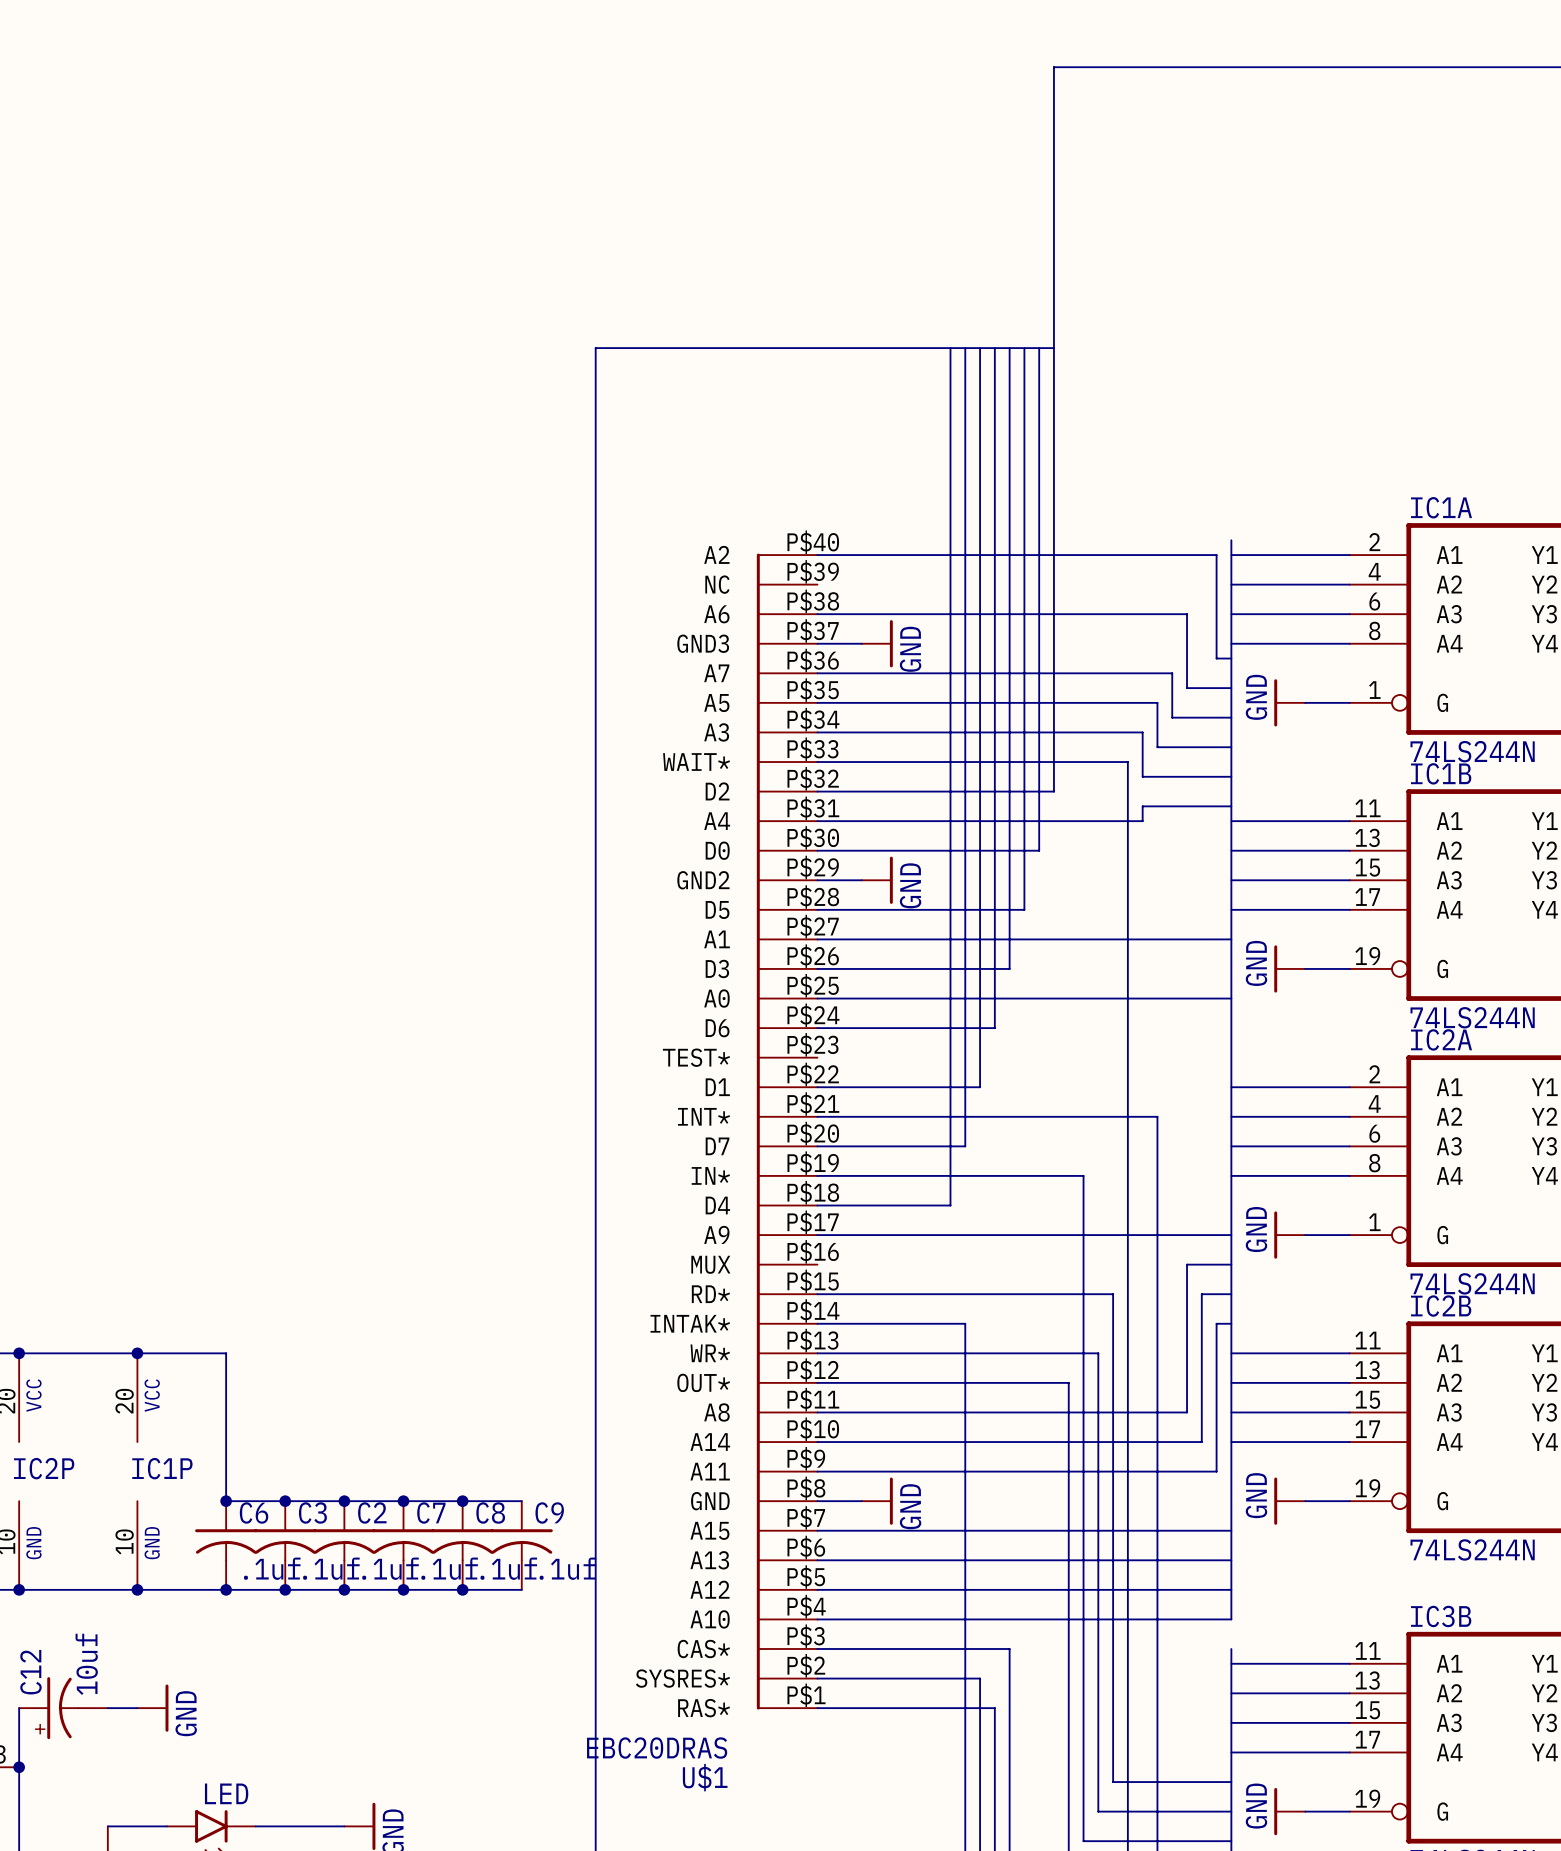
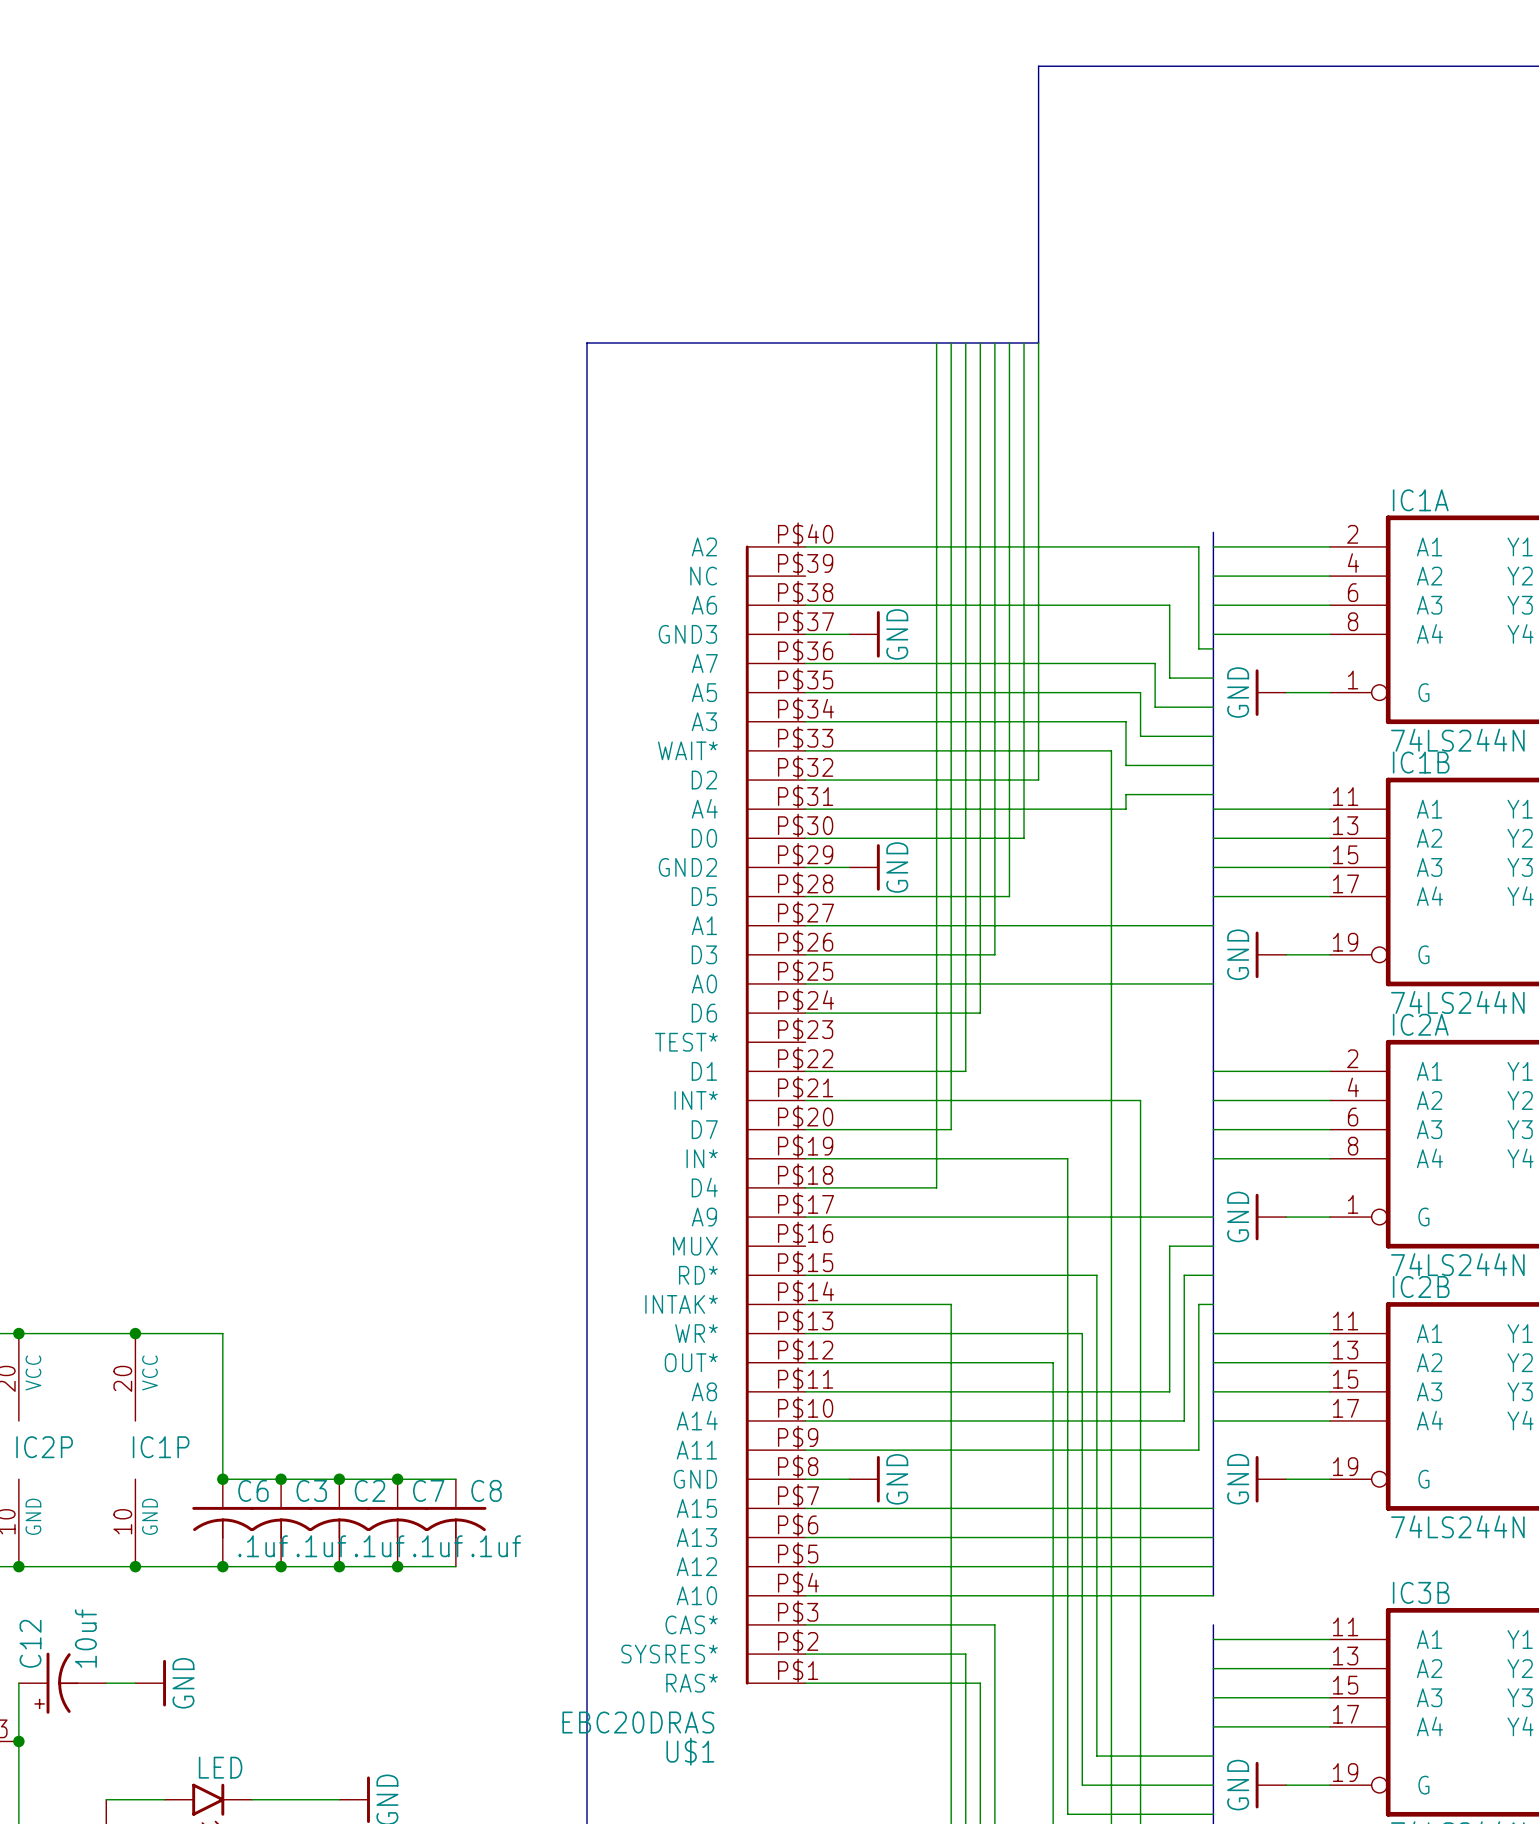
wire: (462, 1501) (521, 1501) -> none
junction: (462, 1501) -> none
C9: .1uf (521, 1545) -> none
wire: (462, 1589) (521, 1589) -> none
junction: (462, 1589) -> none

